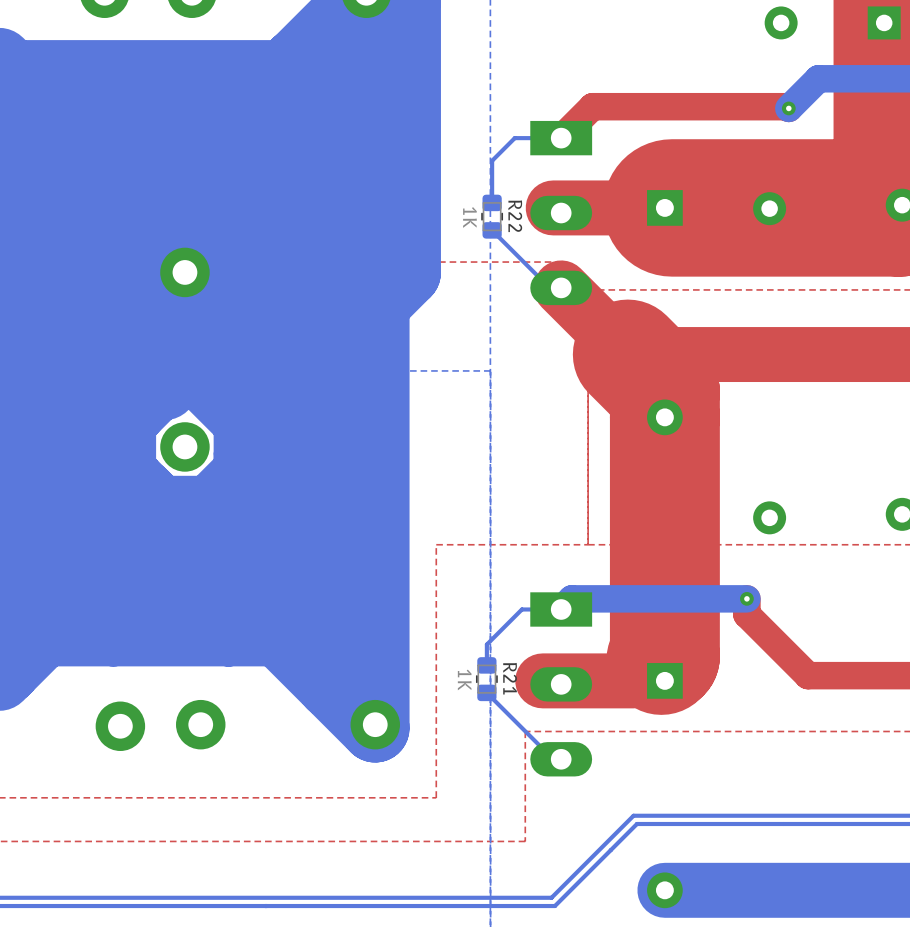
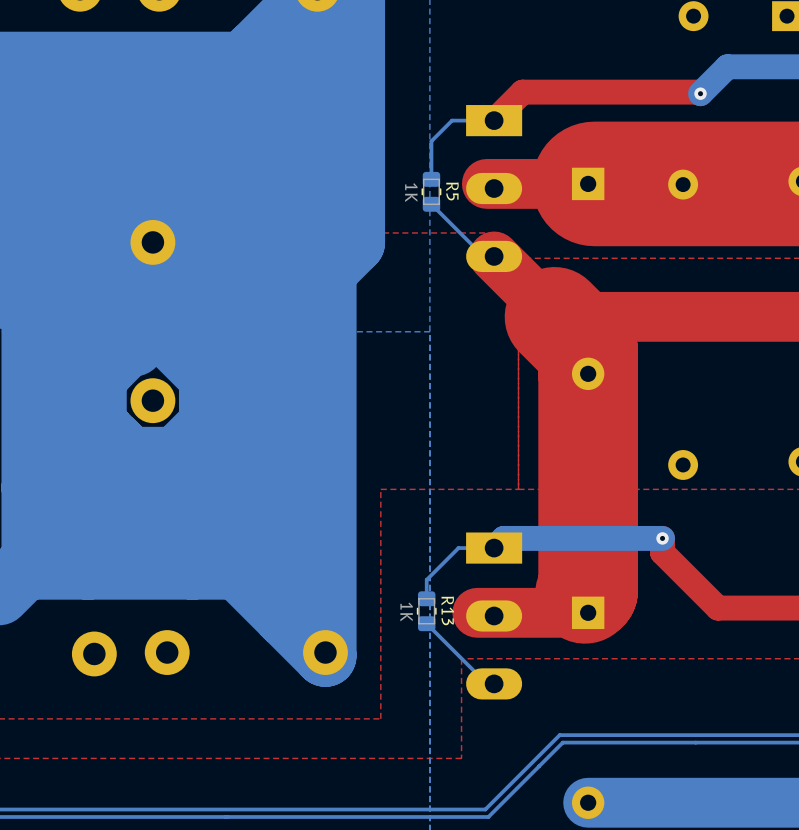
R22 name: R22 (515, 216) -> R5 (452, 191)
R21 name: R21 (510, 678) -> R13 (447, 610)

